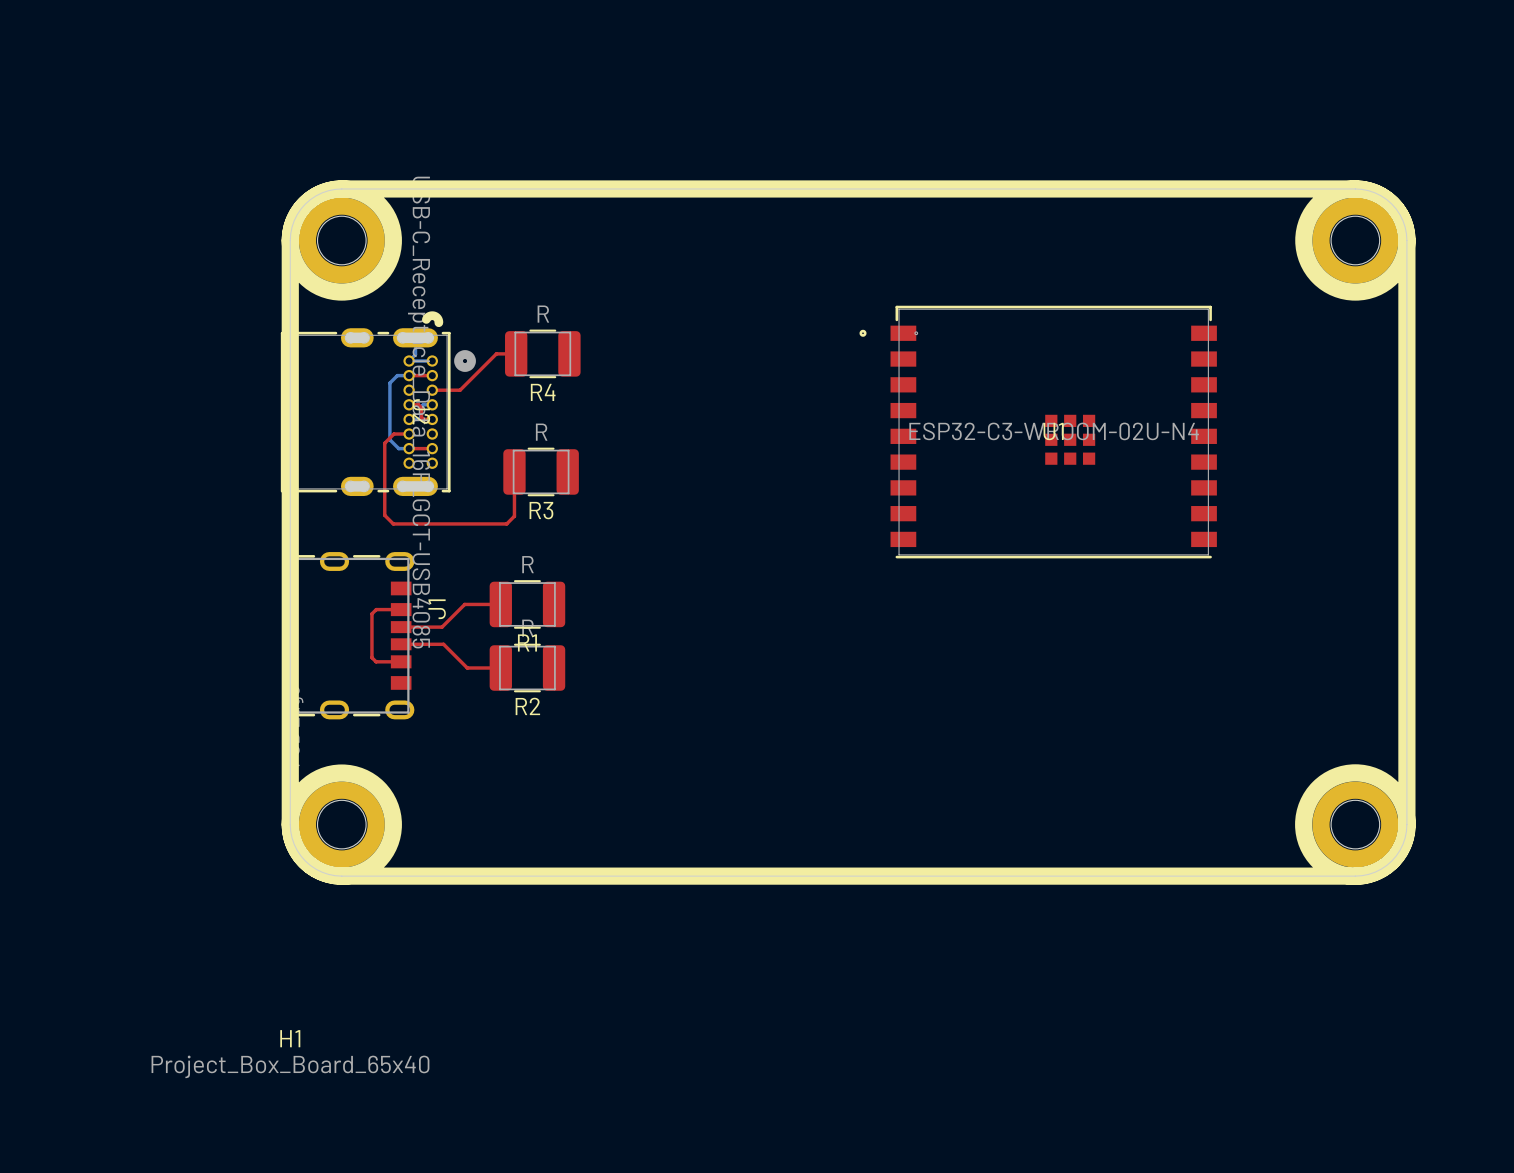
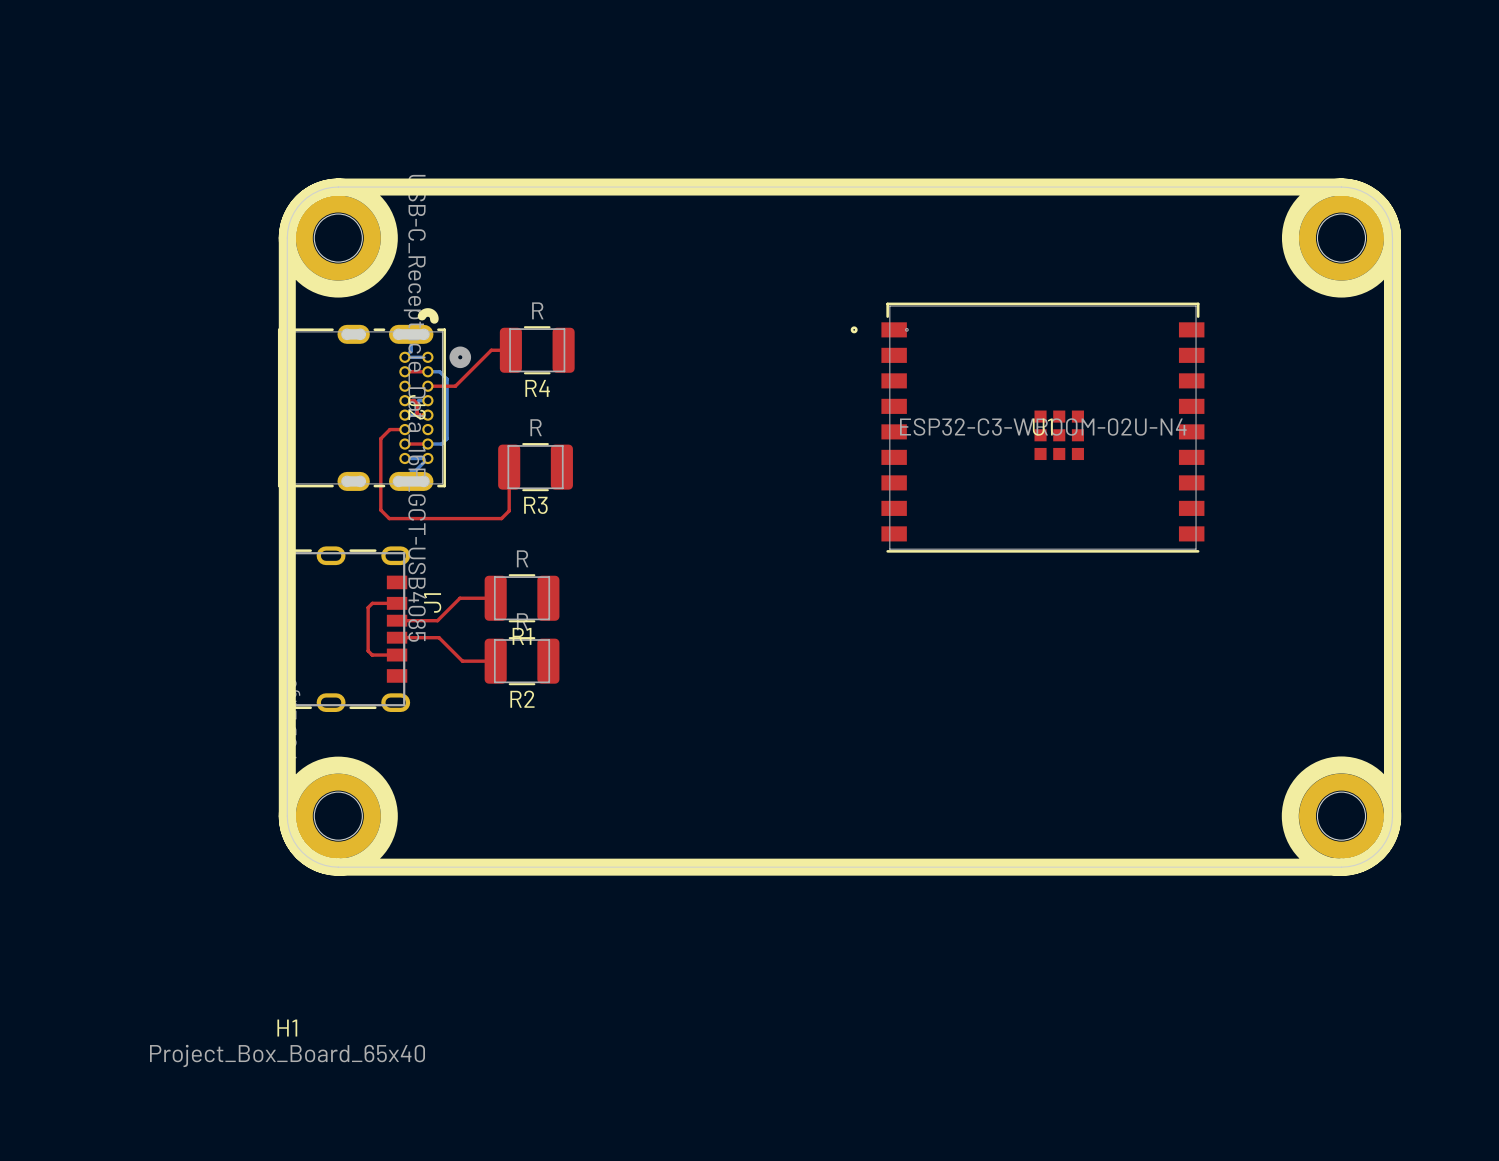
bottom track: (409, 375) (397, 375) (389, 383) (389, 439) (398, 448) (409, 448) -> none
bottom track: none -> (427, 371) (439, 371) (447, 379) (447, 438) (441, 444) (427, 444)
bottom track: none -> (404, 458) (427, 458) (415, 471) (411, 471)

